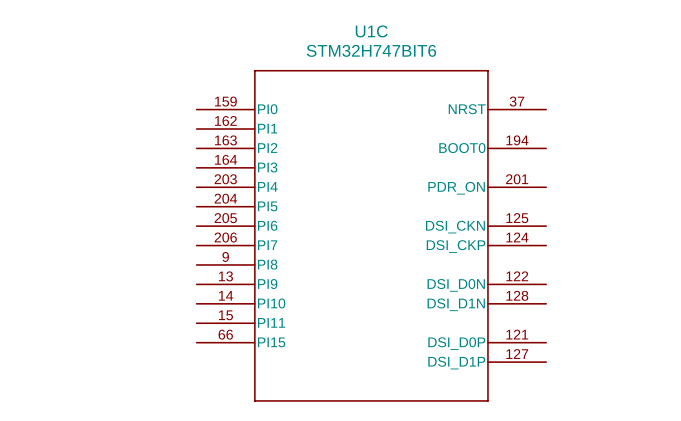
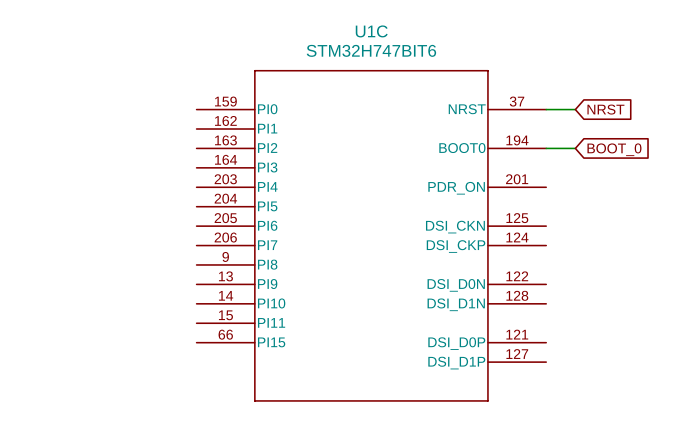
wire: none -> (546, 109) (575, 109)
global label: none -> NRST (605, 109)
wire: none -> (546, 148) (575, 148)
global label: none -> BOOT_0 (614, 149)

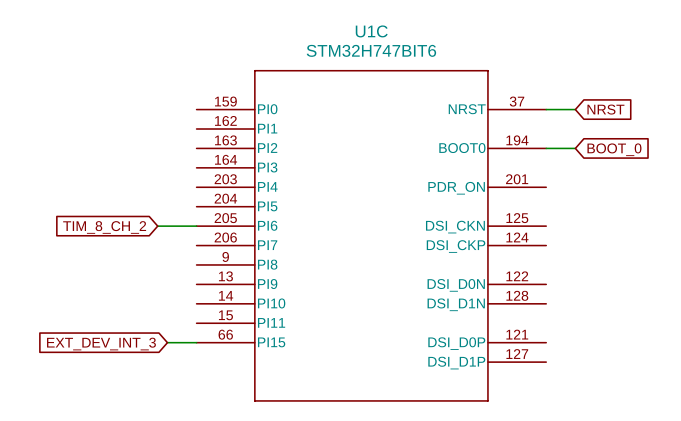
wire: none -> (157, 226) (196, 226)
global label: none -> TIM_8_CH_2 (104, 227)
wire: none -> (167, 342) (196, 342)
global label: none -> EXT_DEV_INT_3 (101, 344)

